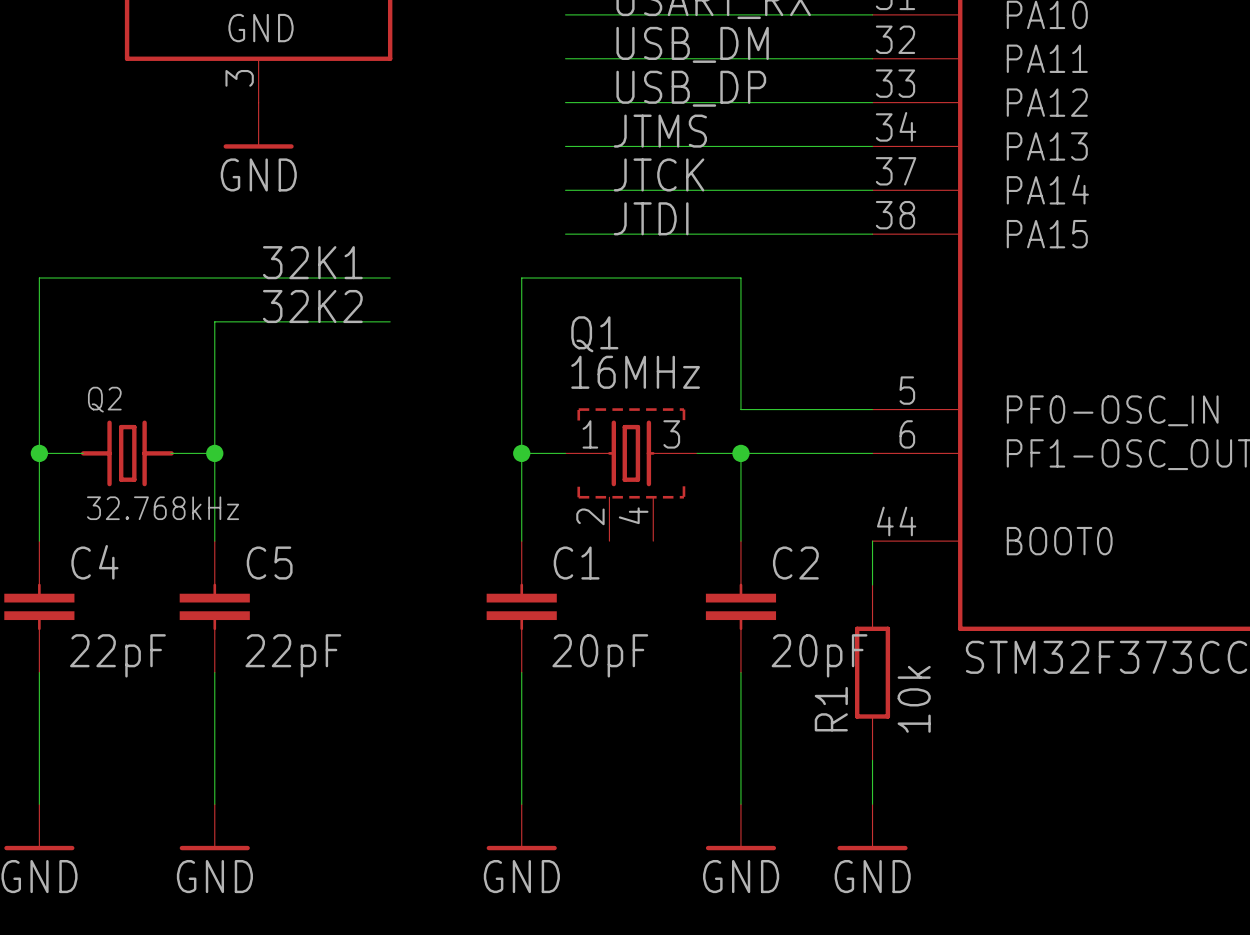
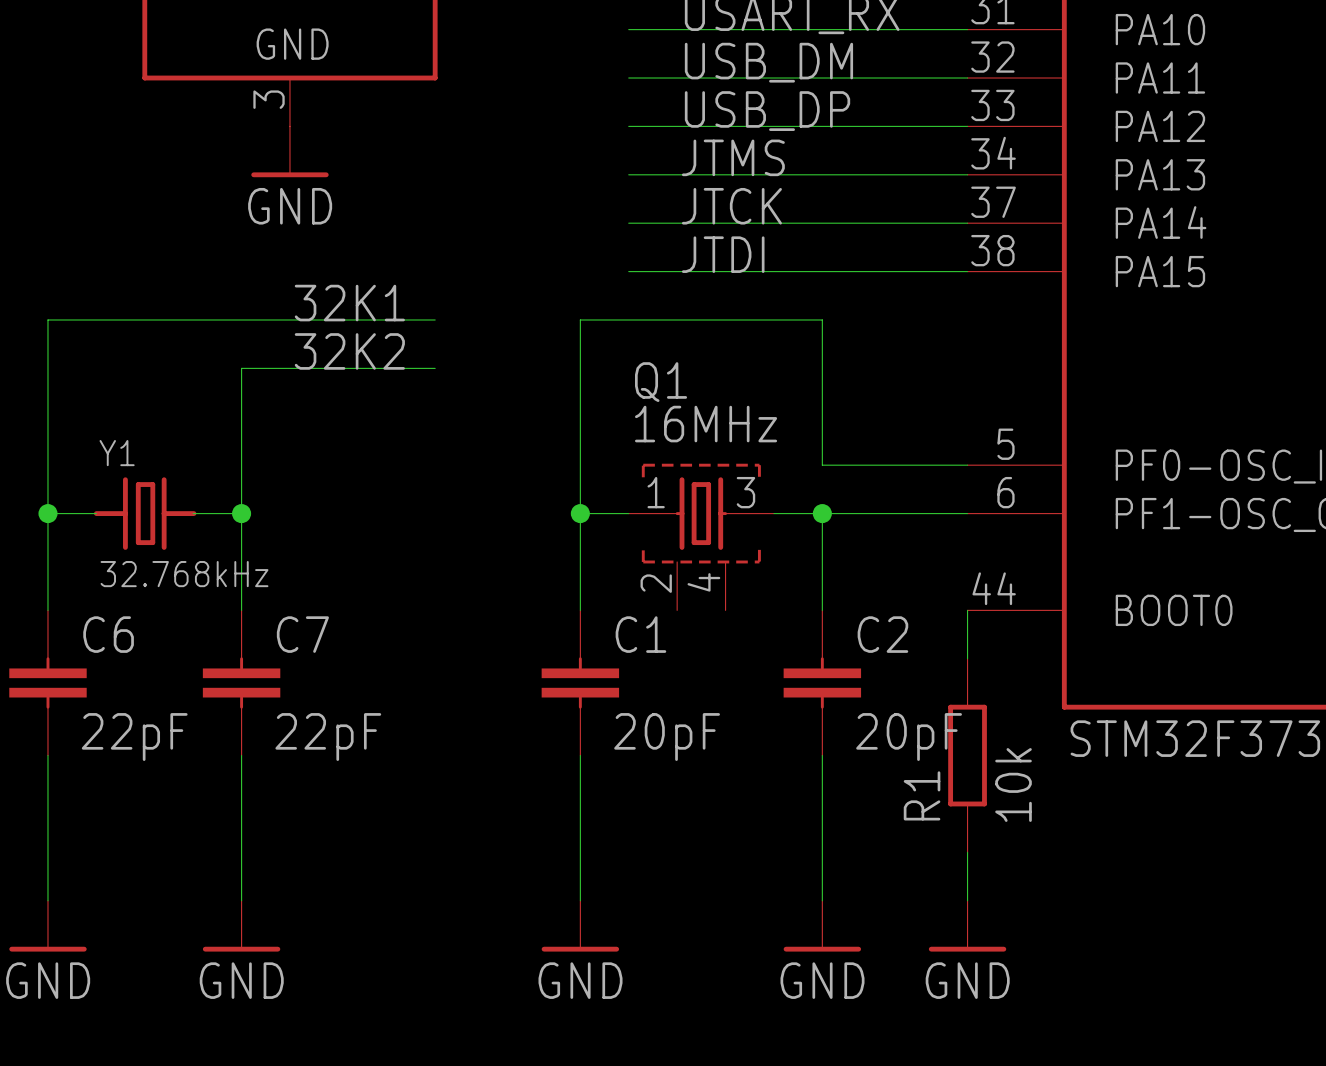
Q2 name: Q2 (104, 399) -> Y1 (117, 453)
C4 name: C4 (94, 562) -> C6 (108, 634)
C5 name: C5 (269, 563) -> C7 (302, 634)

